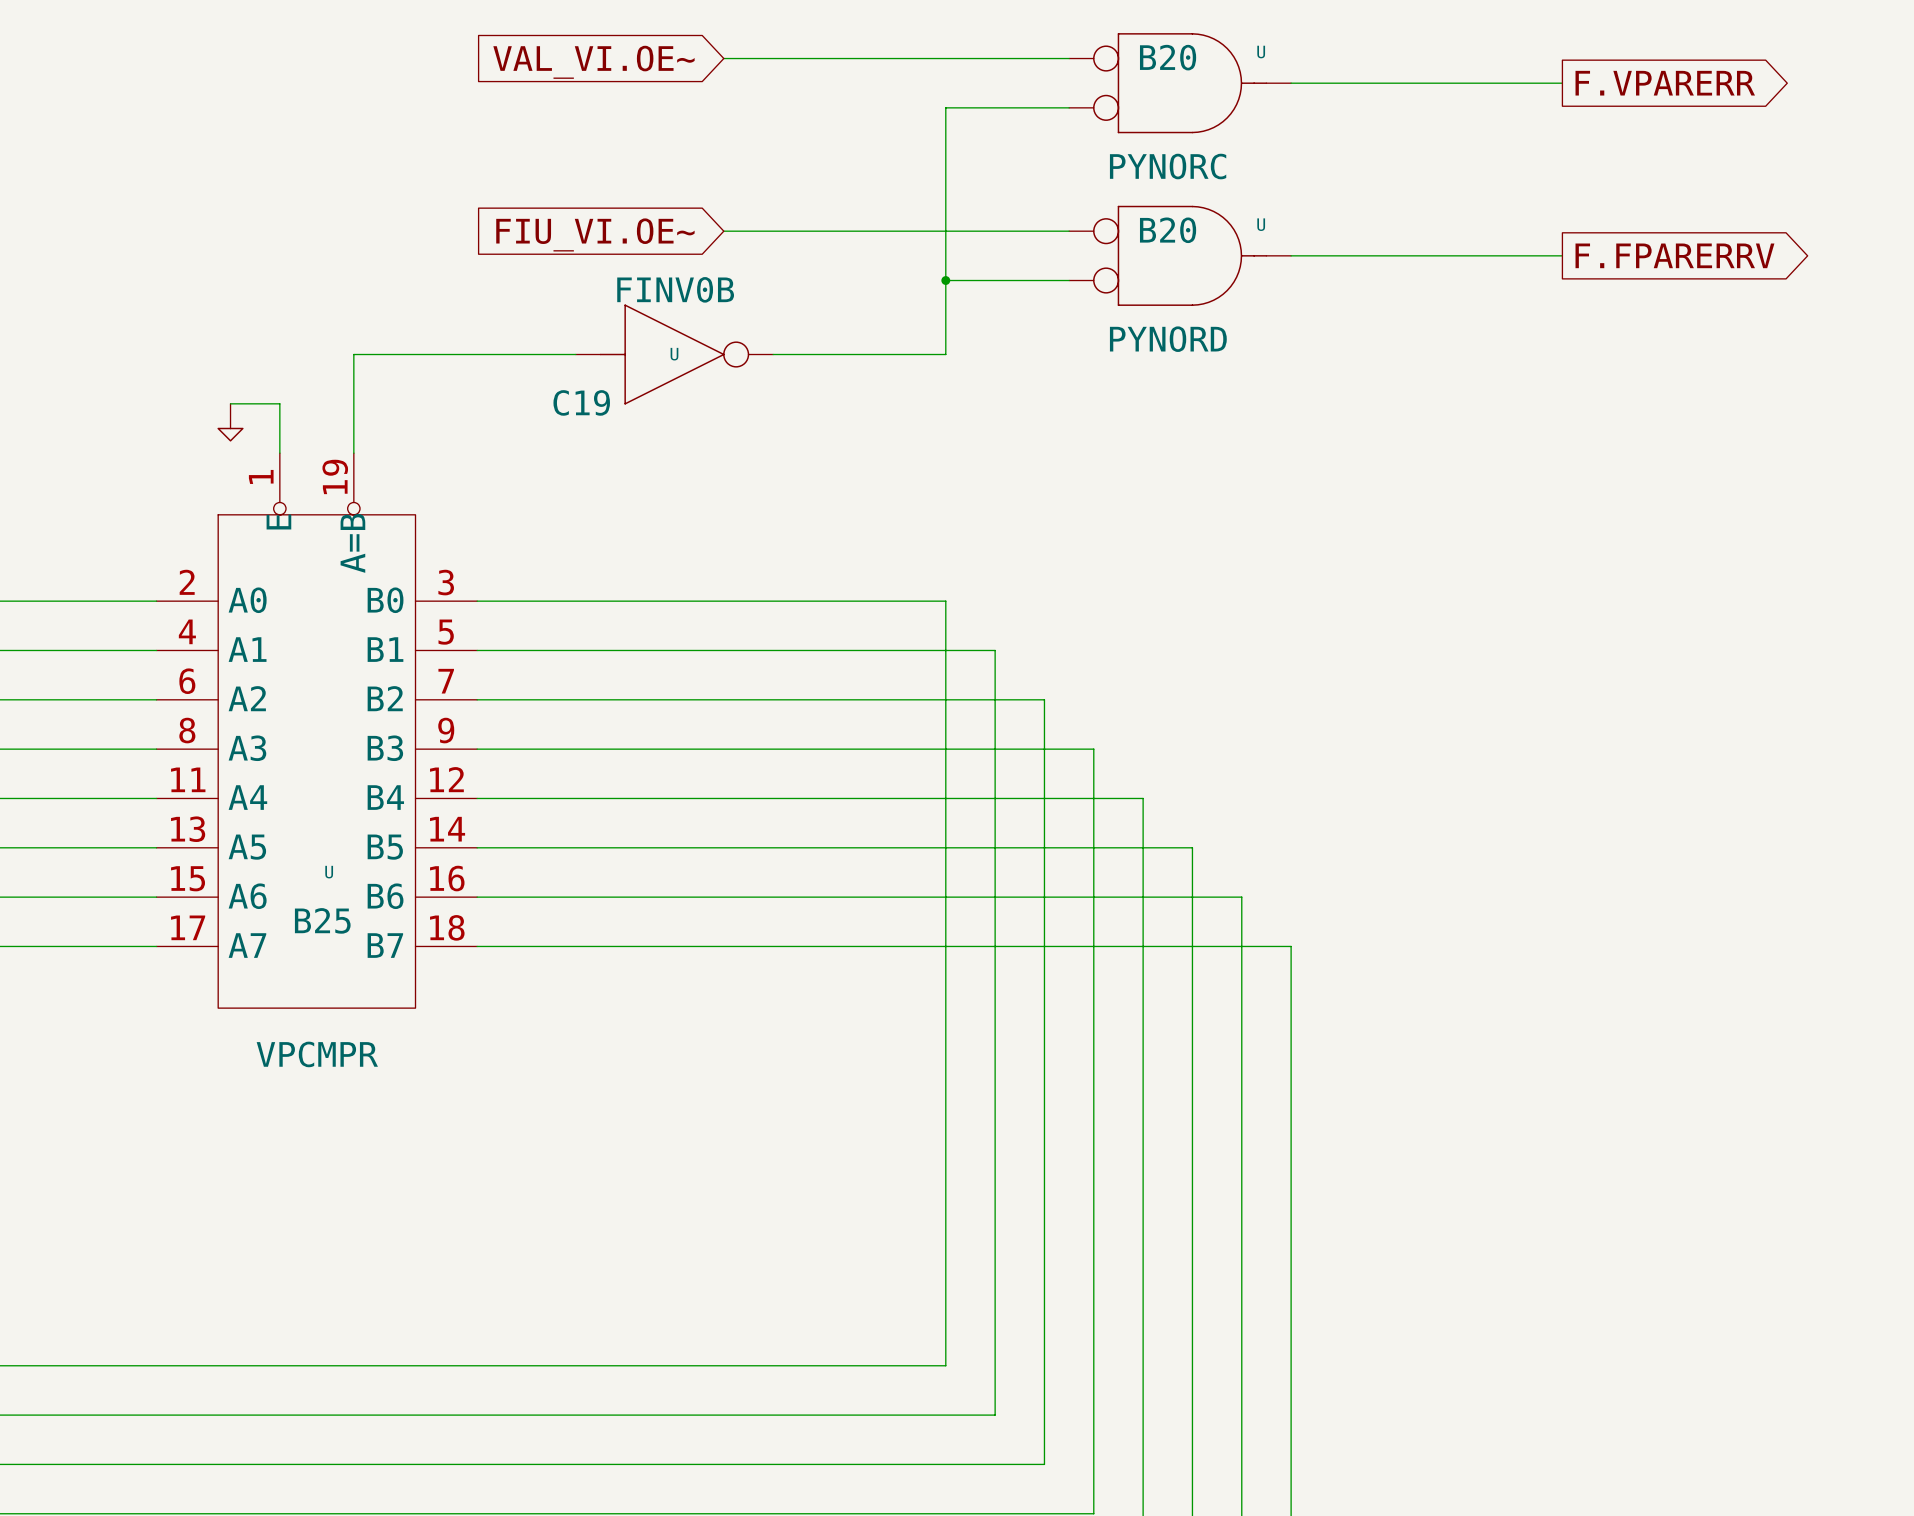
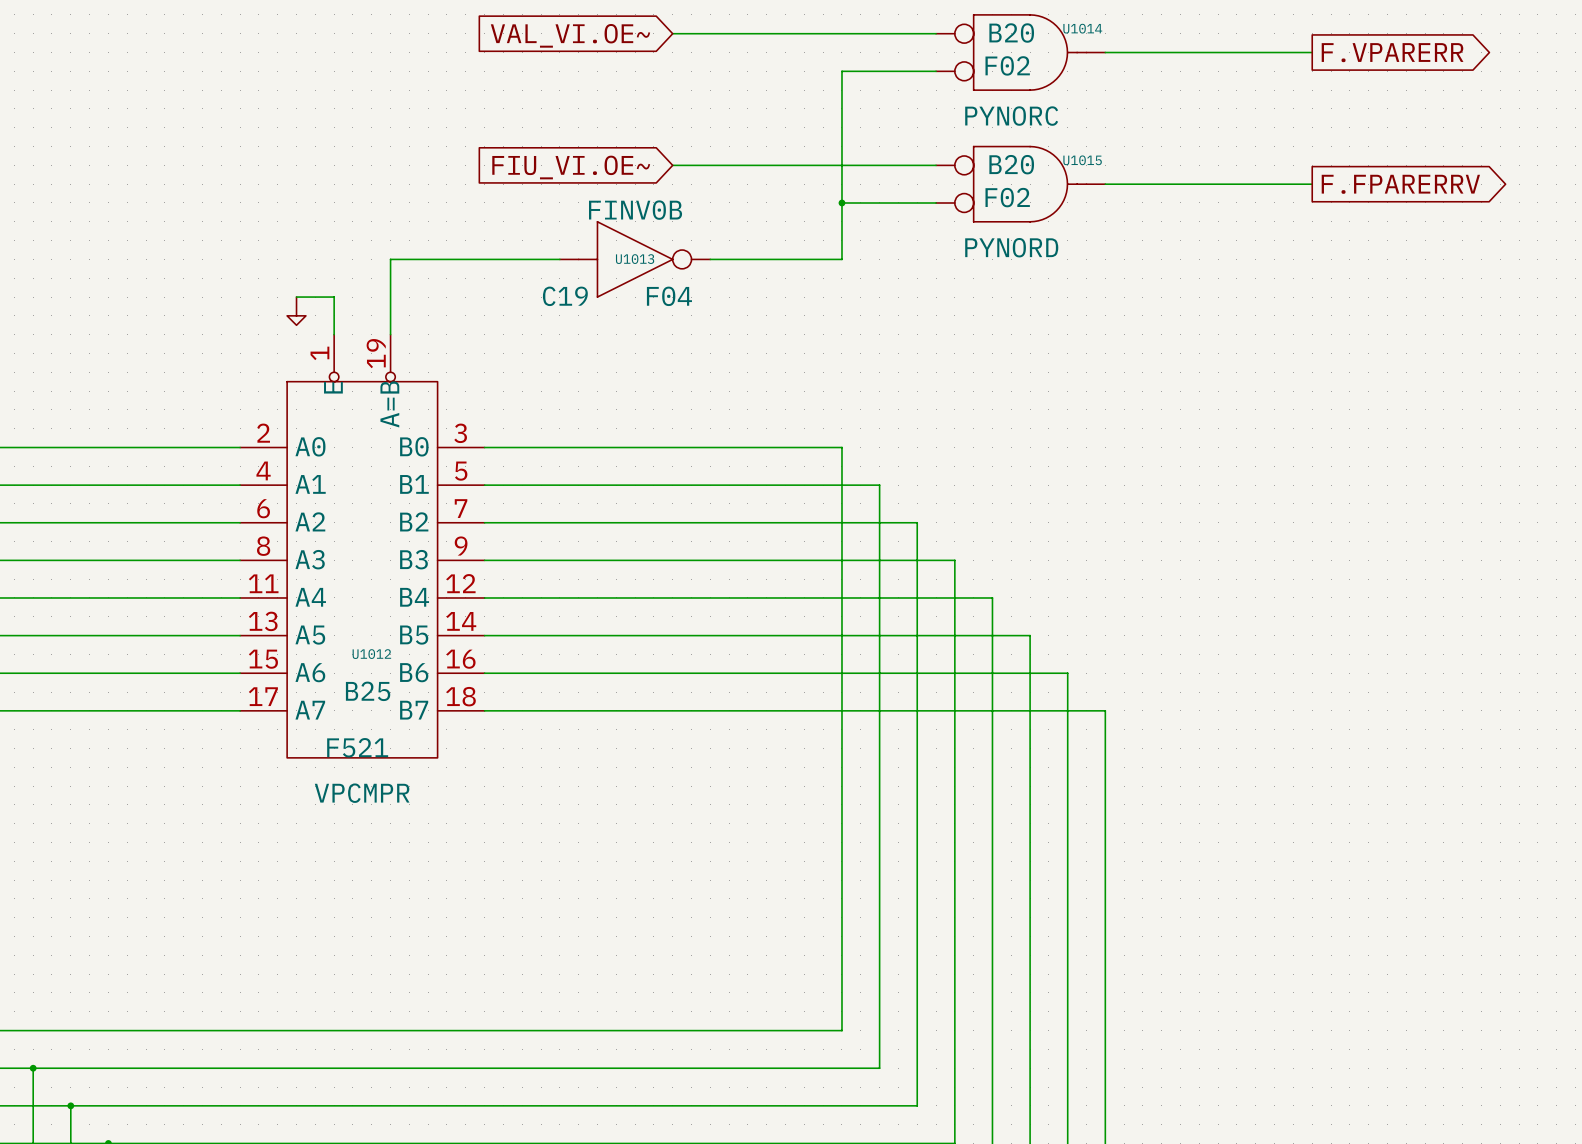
U name: U (1261, 52) -> U1014 (1082, 28)
U value: none -> F02 (1007, 65)
U name: U (1261, 224) -> U1015 (1082, 160)
U value: none -> F02 (1007, 197)
U name: U (674, 354) -> U1013 (635, 259)
U value: none -> F04 (669, 296)
U name: U (329, 872) -> U1012 (371, 654)
U value: none -> F521 (357, 747)

